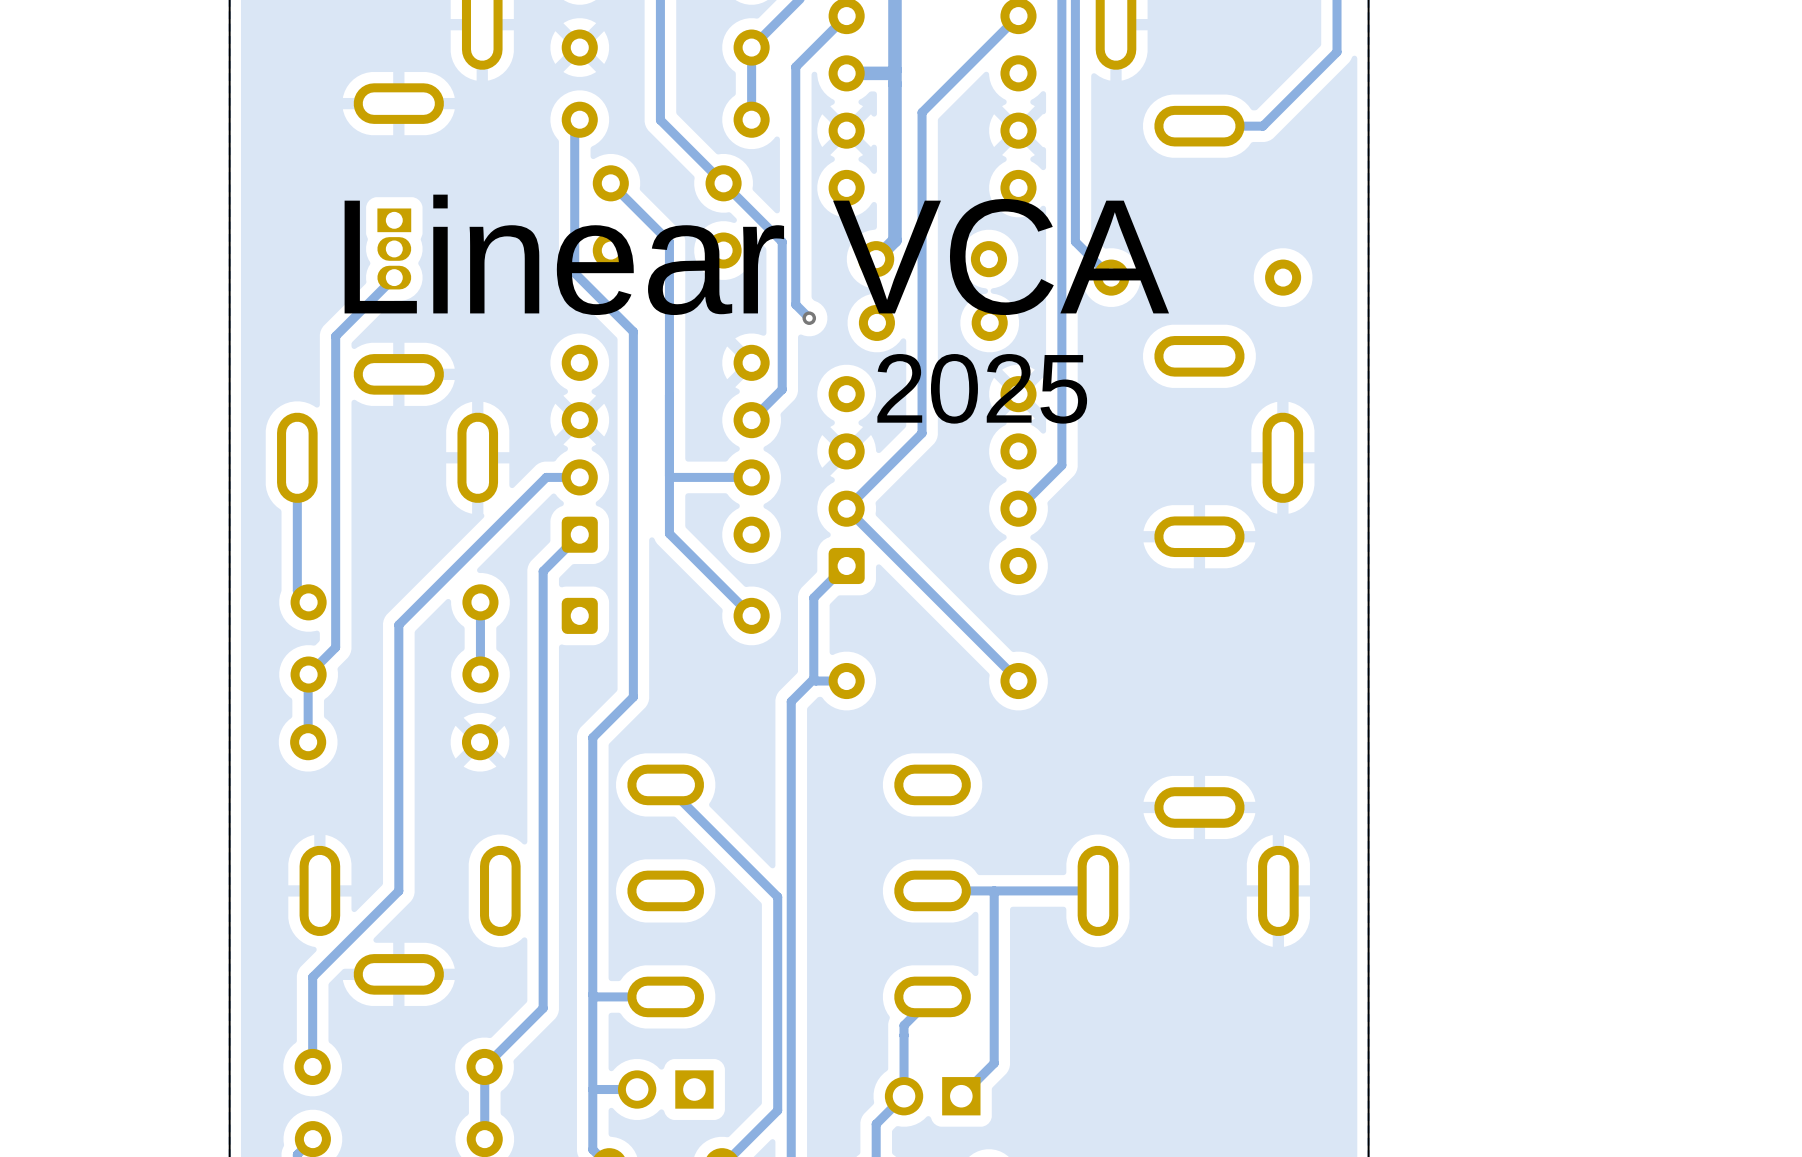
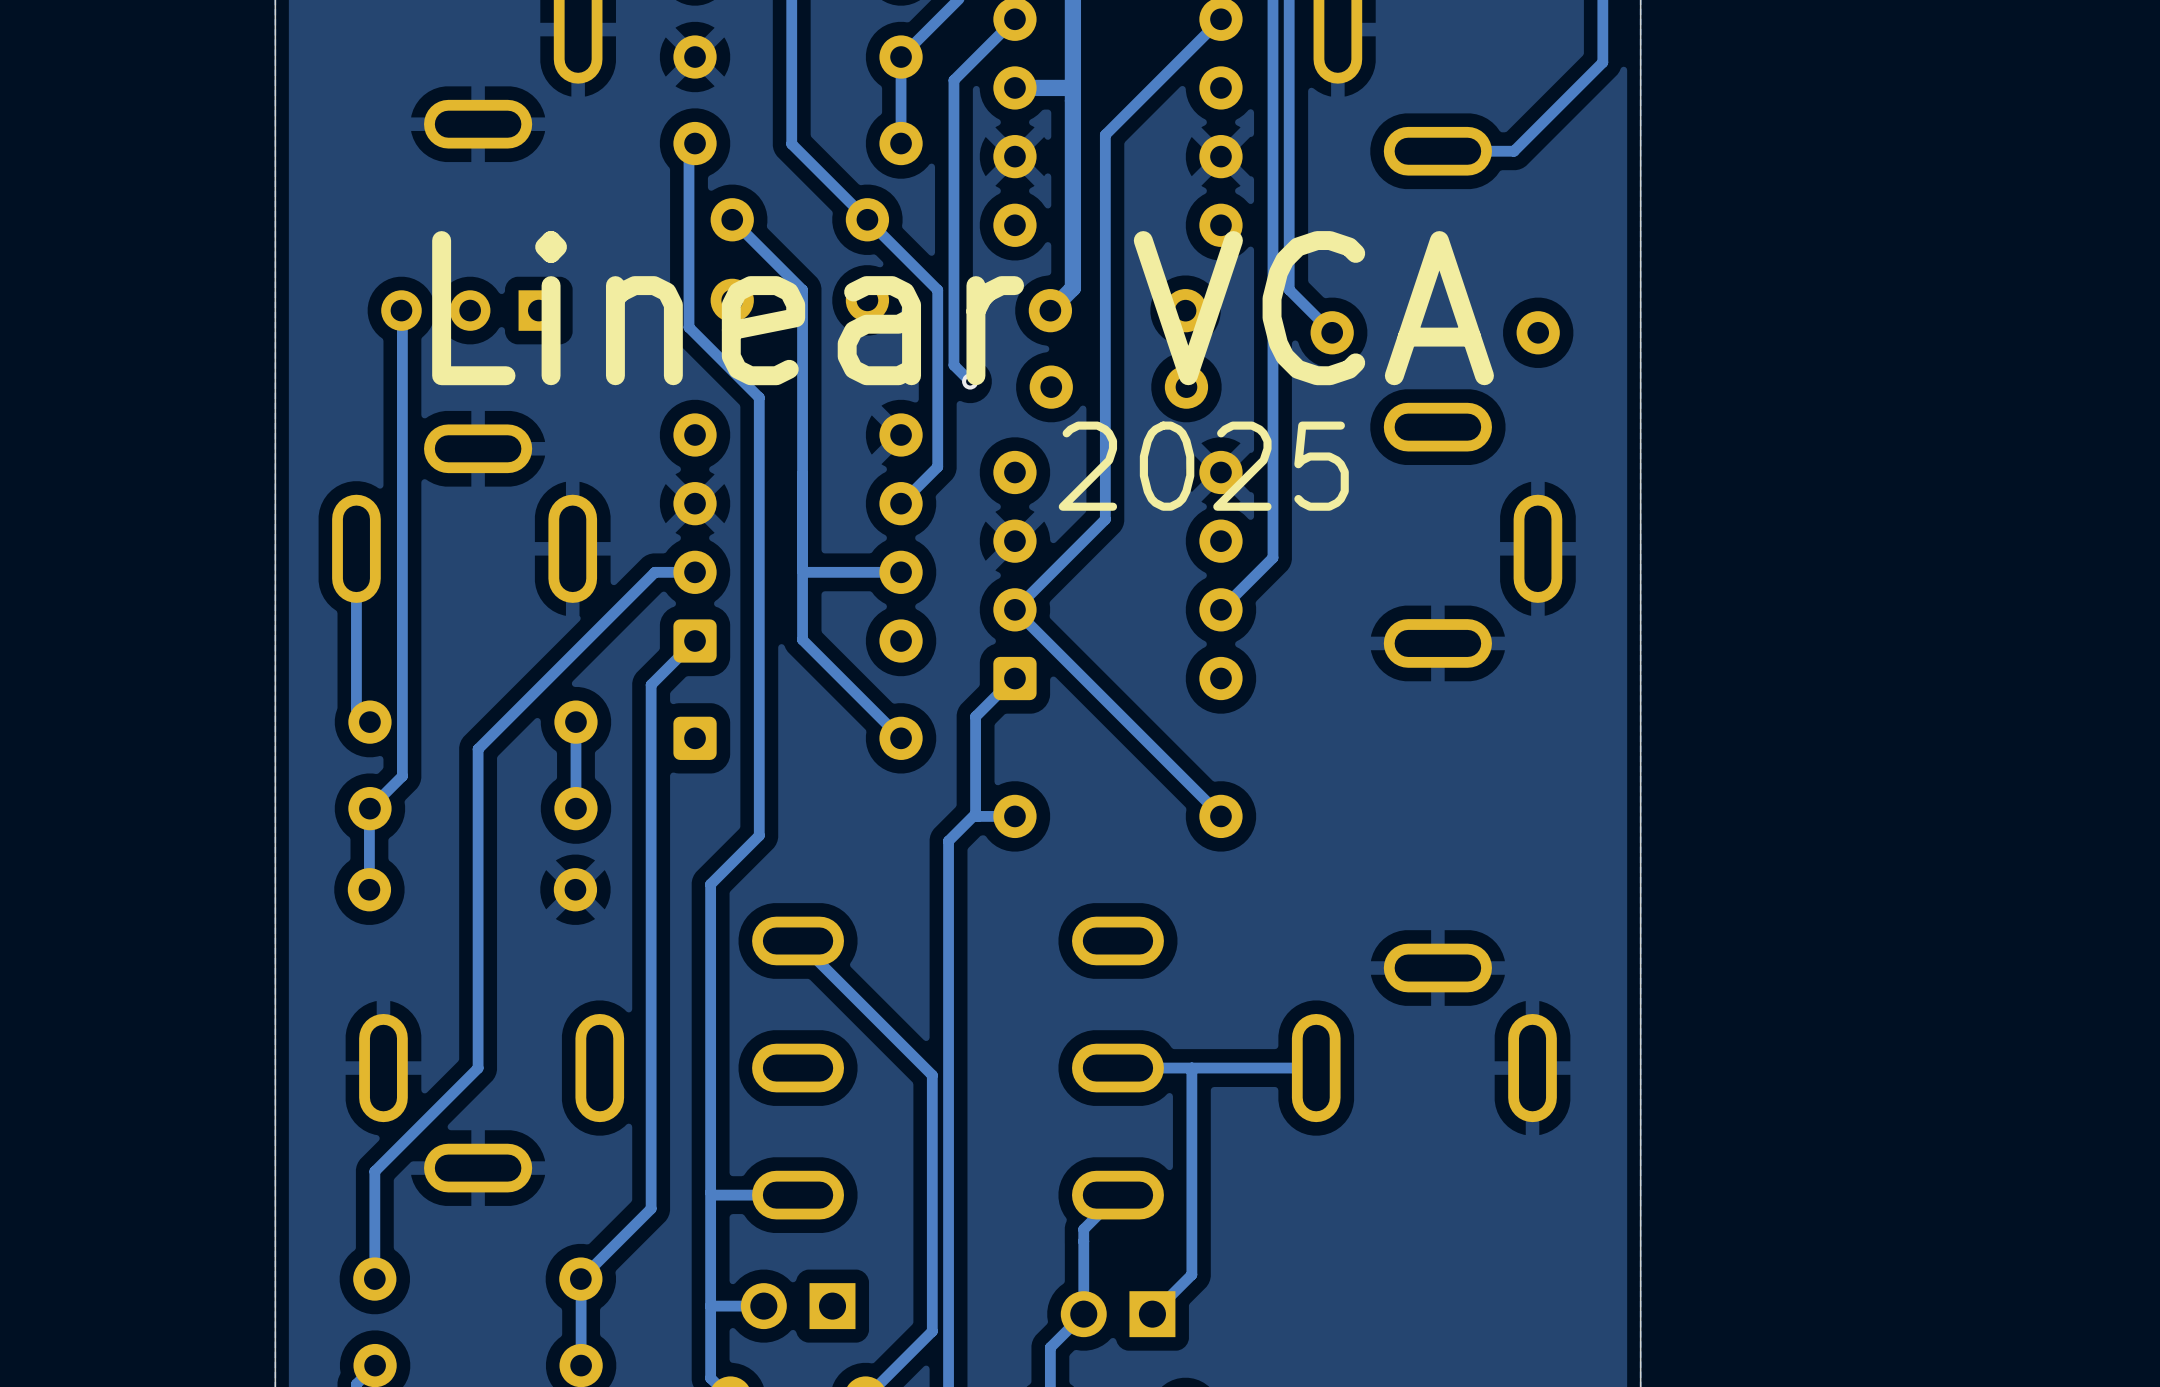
part footprint: [377, 208, 412, 290] -> [381, 290, 560, 331]
track: (394, 277) (335, 336) -> (401, 310) (402, 403)

